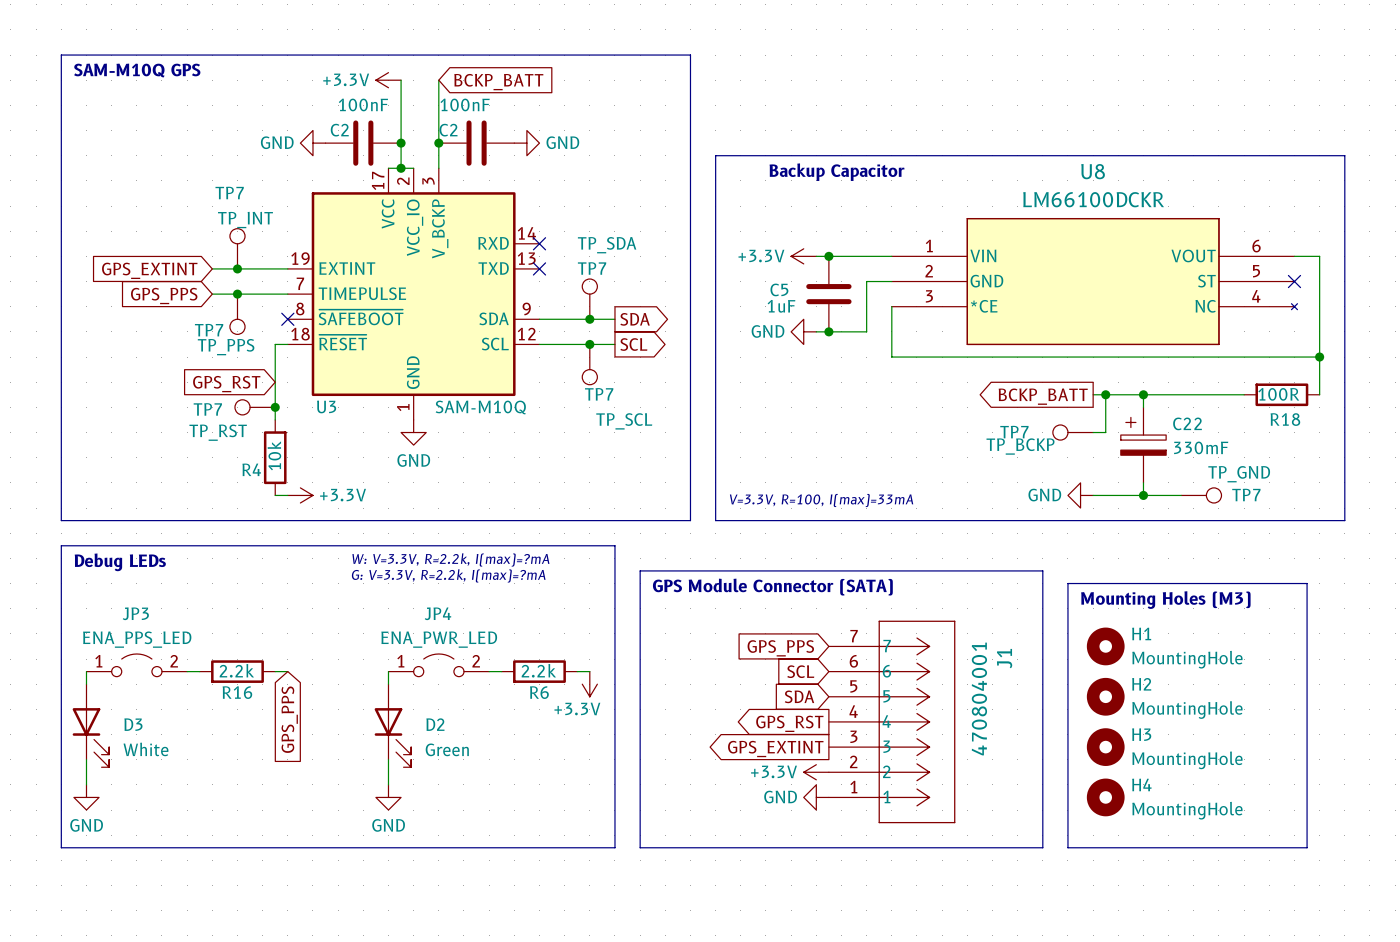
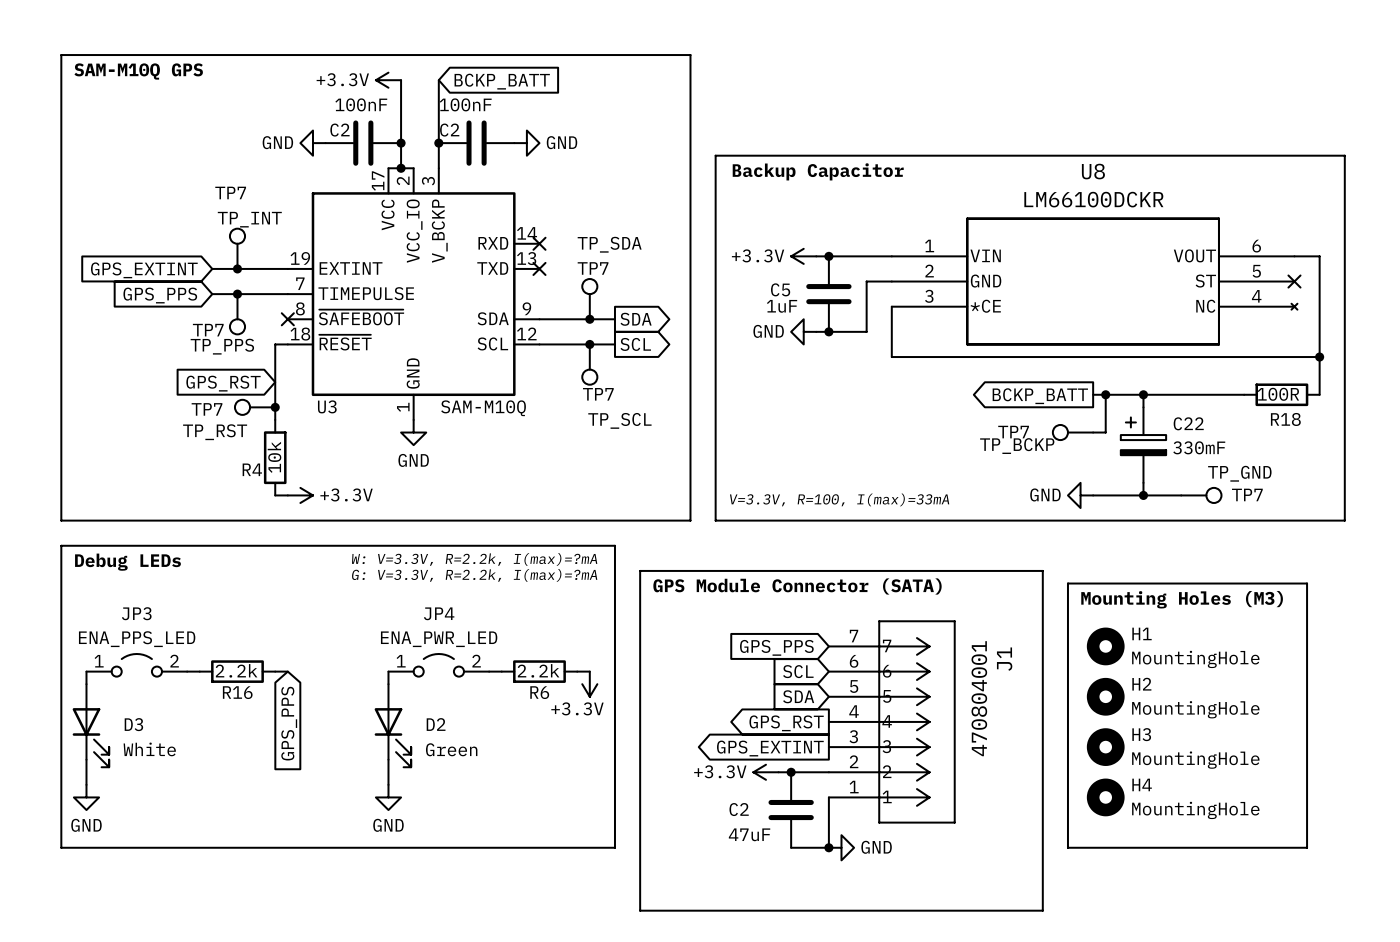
junction: none -> (791, 772)
power symbol position: +3.3V (816, 772) -> +3.3V (765, 772)
power symbol rotation: 0° (816, 797) -> 180° (841, 847)
power symbol position: GND (816, 797) -> GND (841, 847)
wire: none -> (828, 797) (828, 847) (791, 847)
C2: none -> 47uF (791, 810)
line: (640, 847) (1042, 847) -> (640, 847) (640, 910) (1042, 910) (1042, 847)
junction: none -> (828, 847)

